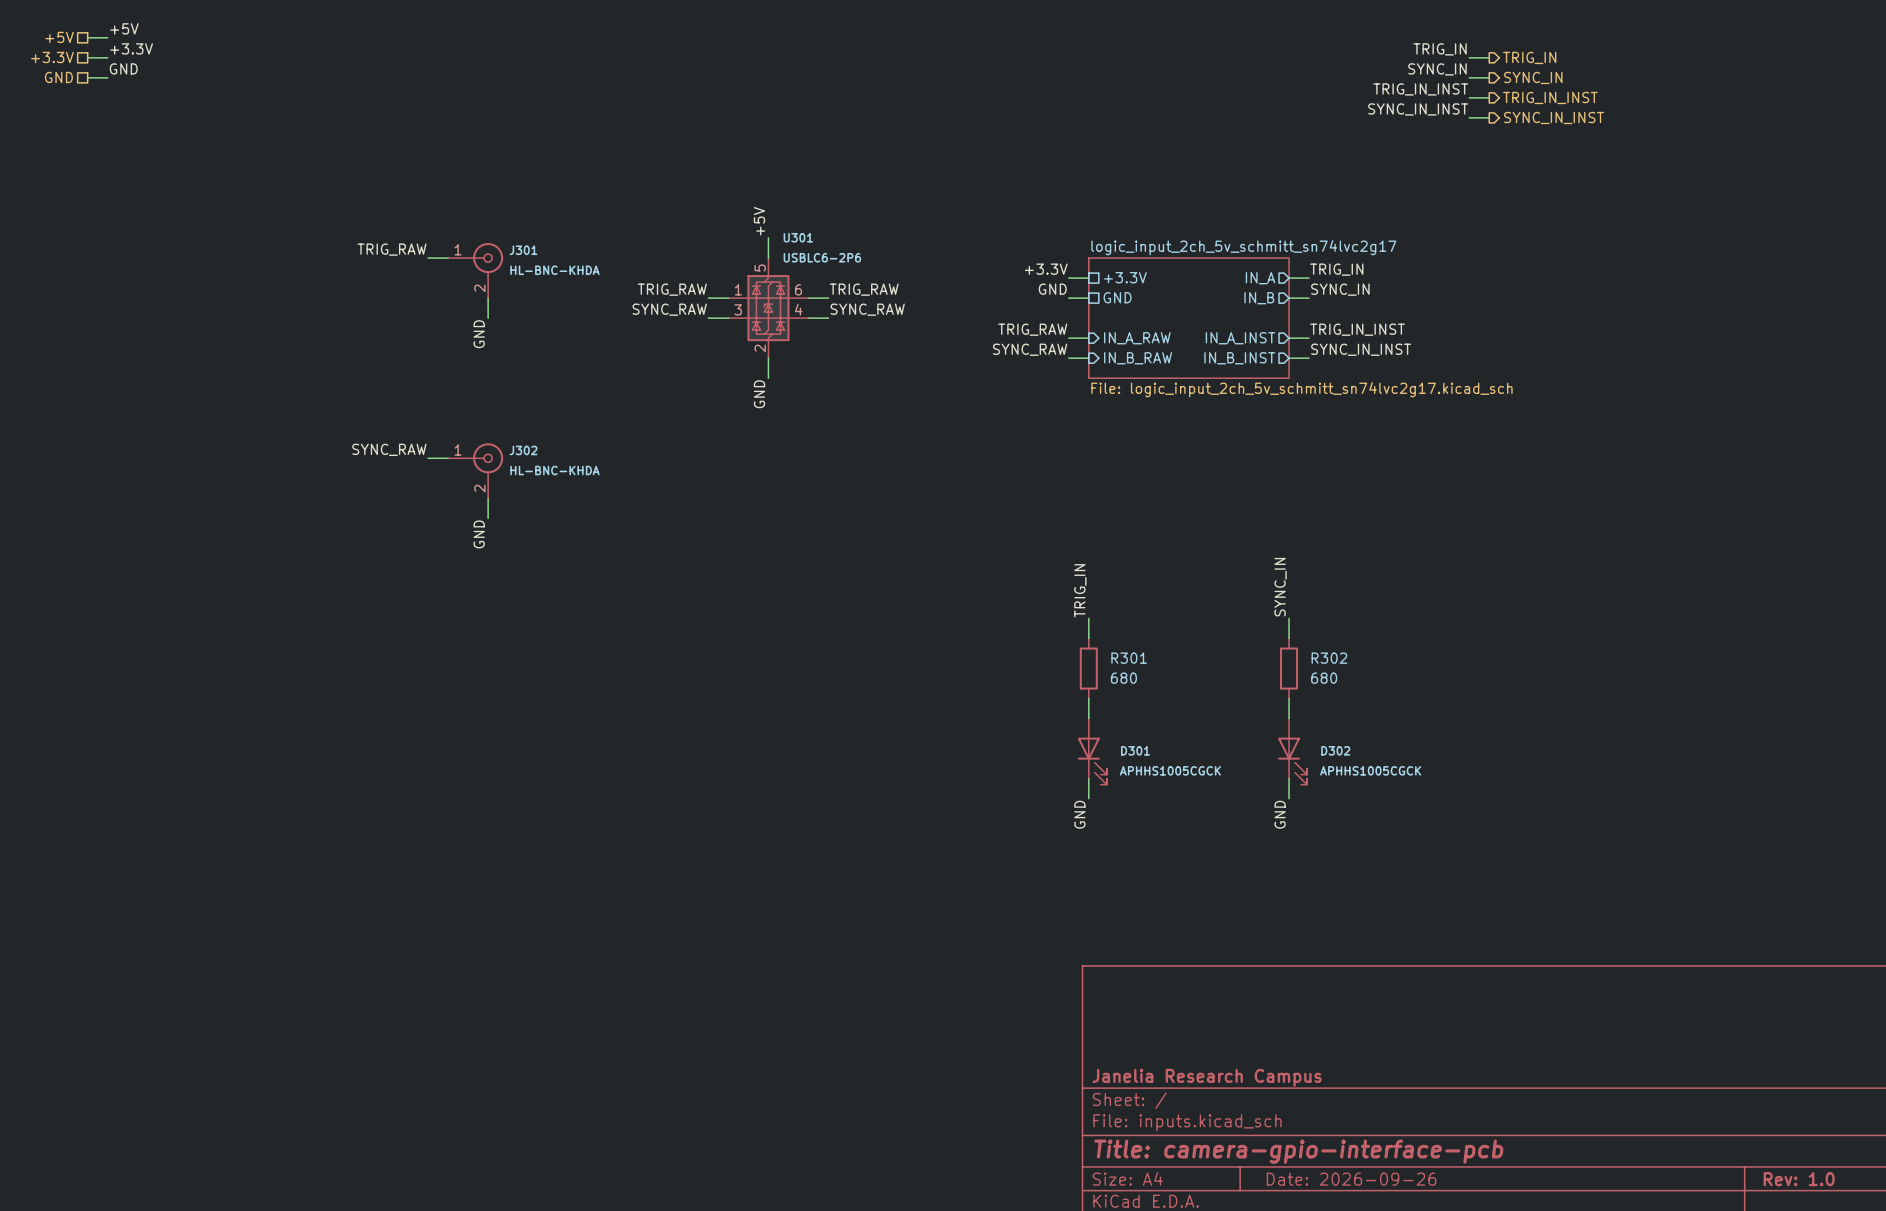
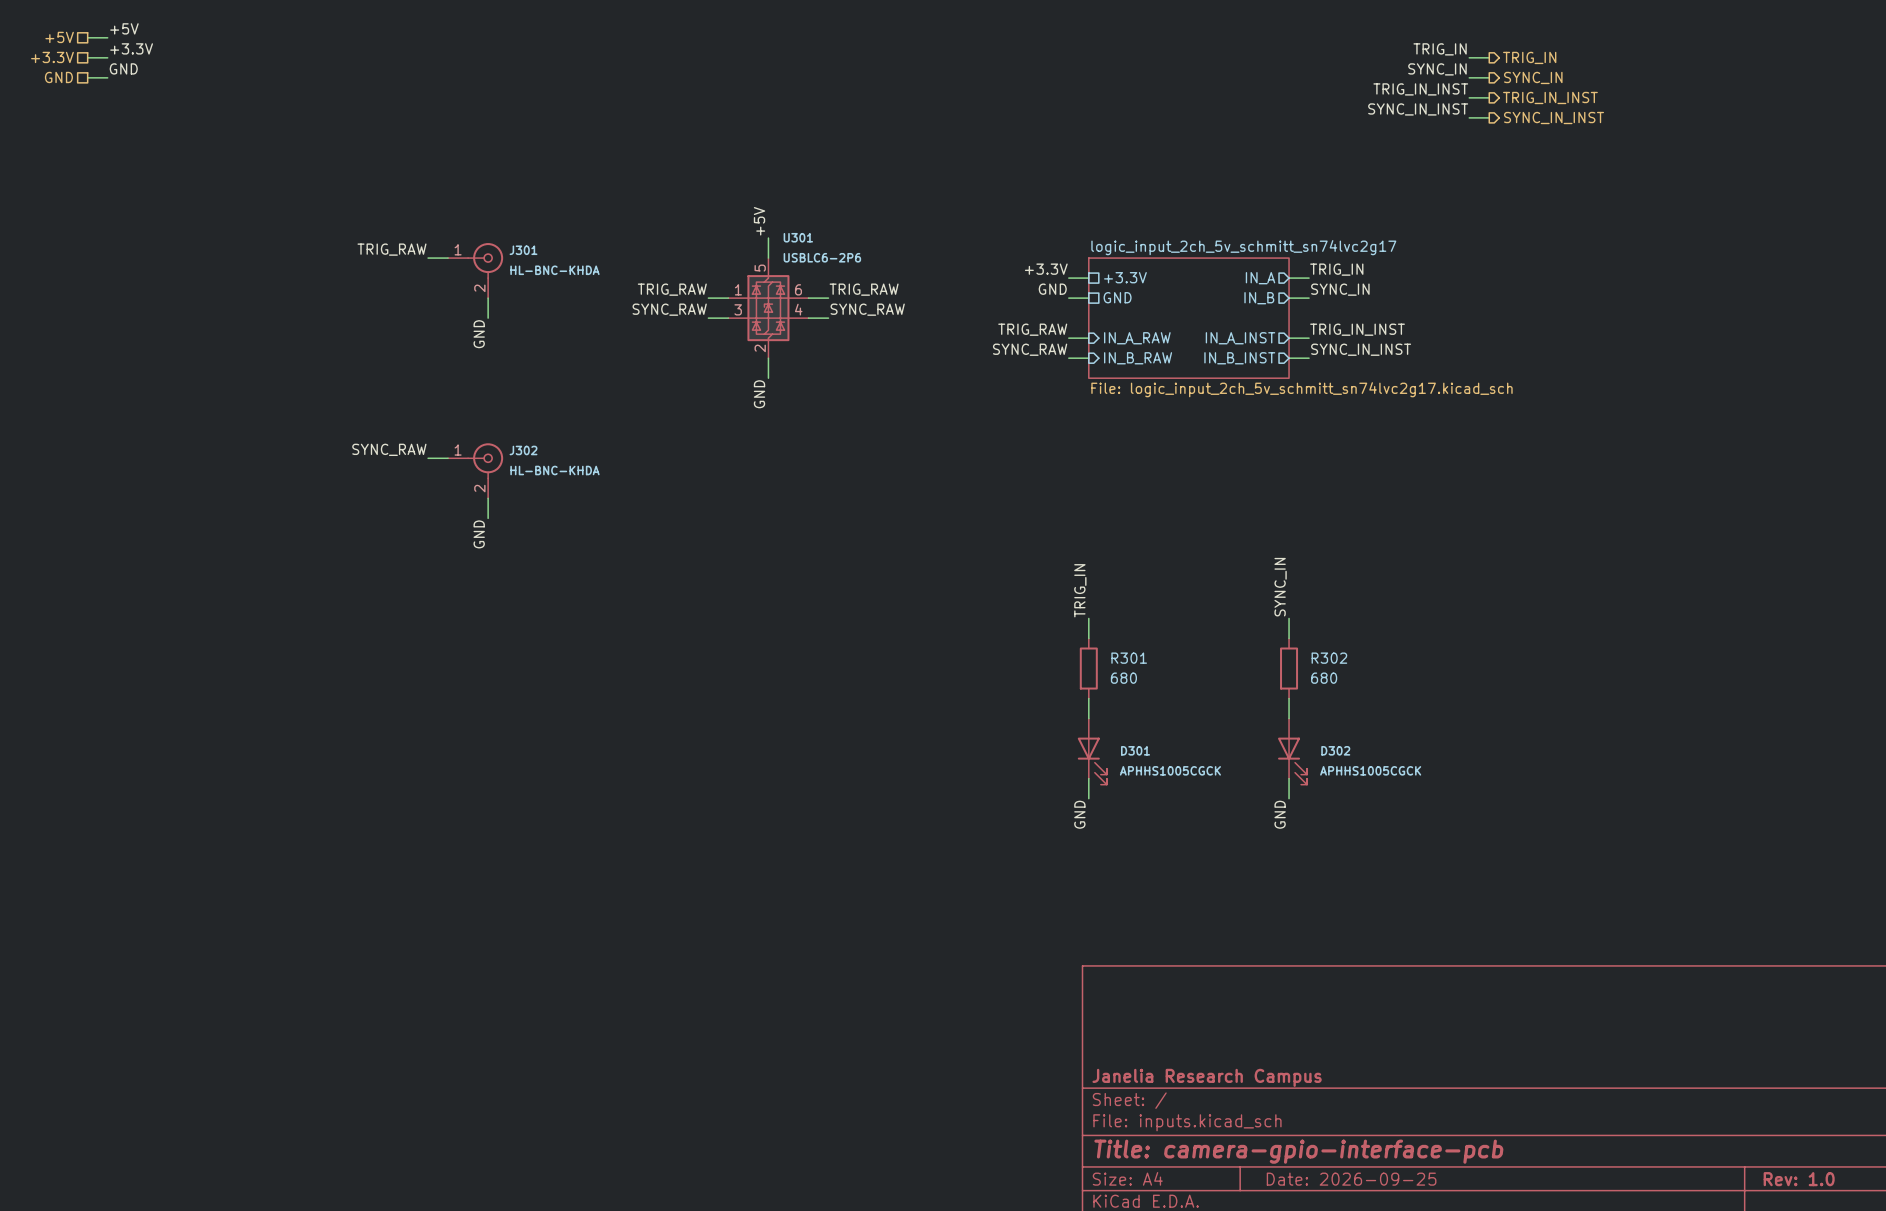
title block: Date: 2026-09-26 (1351, 1179) -> Date: 2026-09-25 (1351, 1179)

